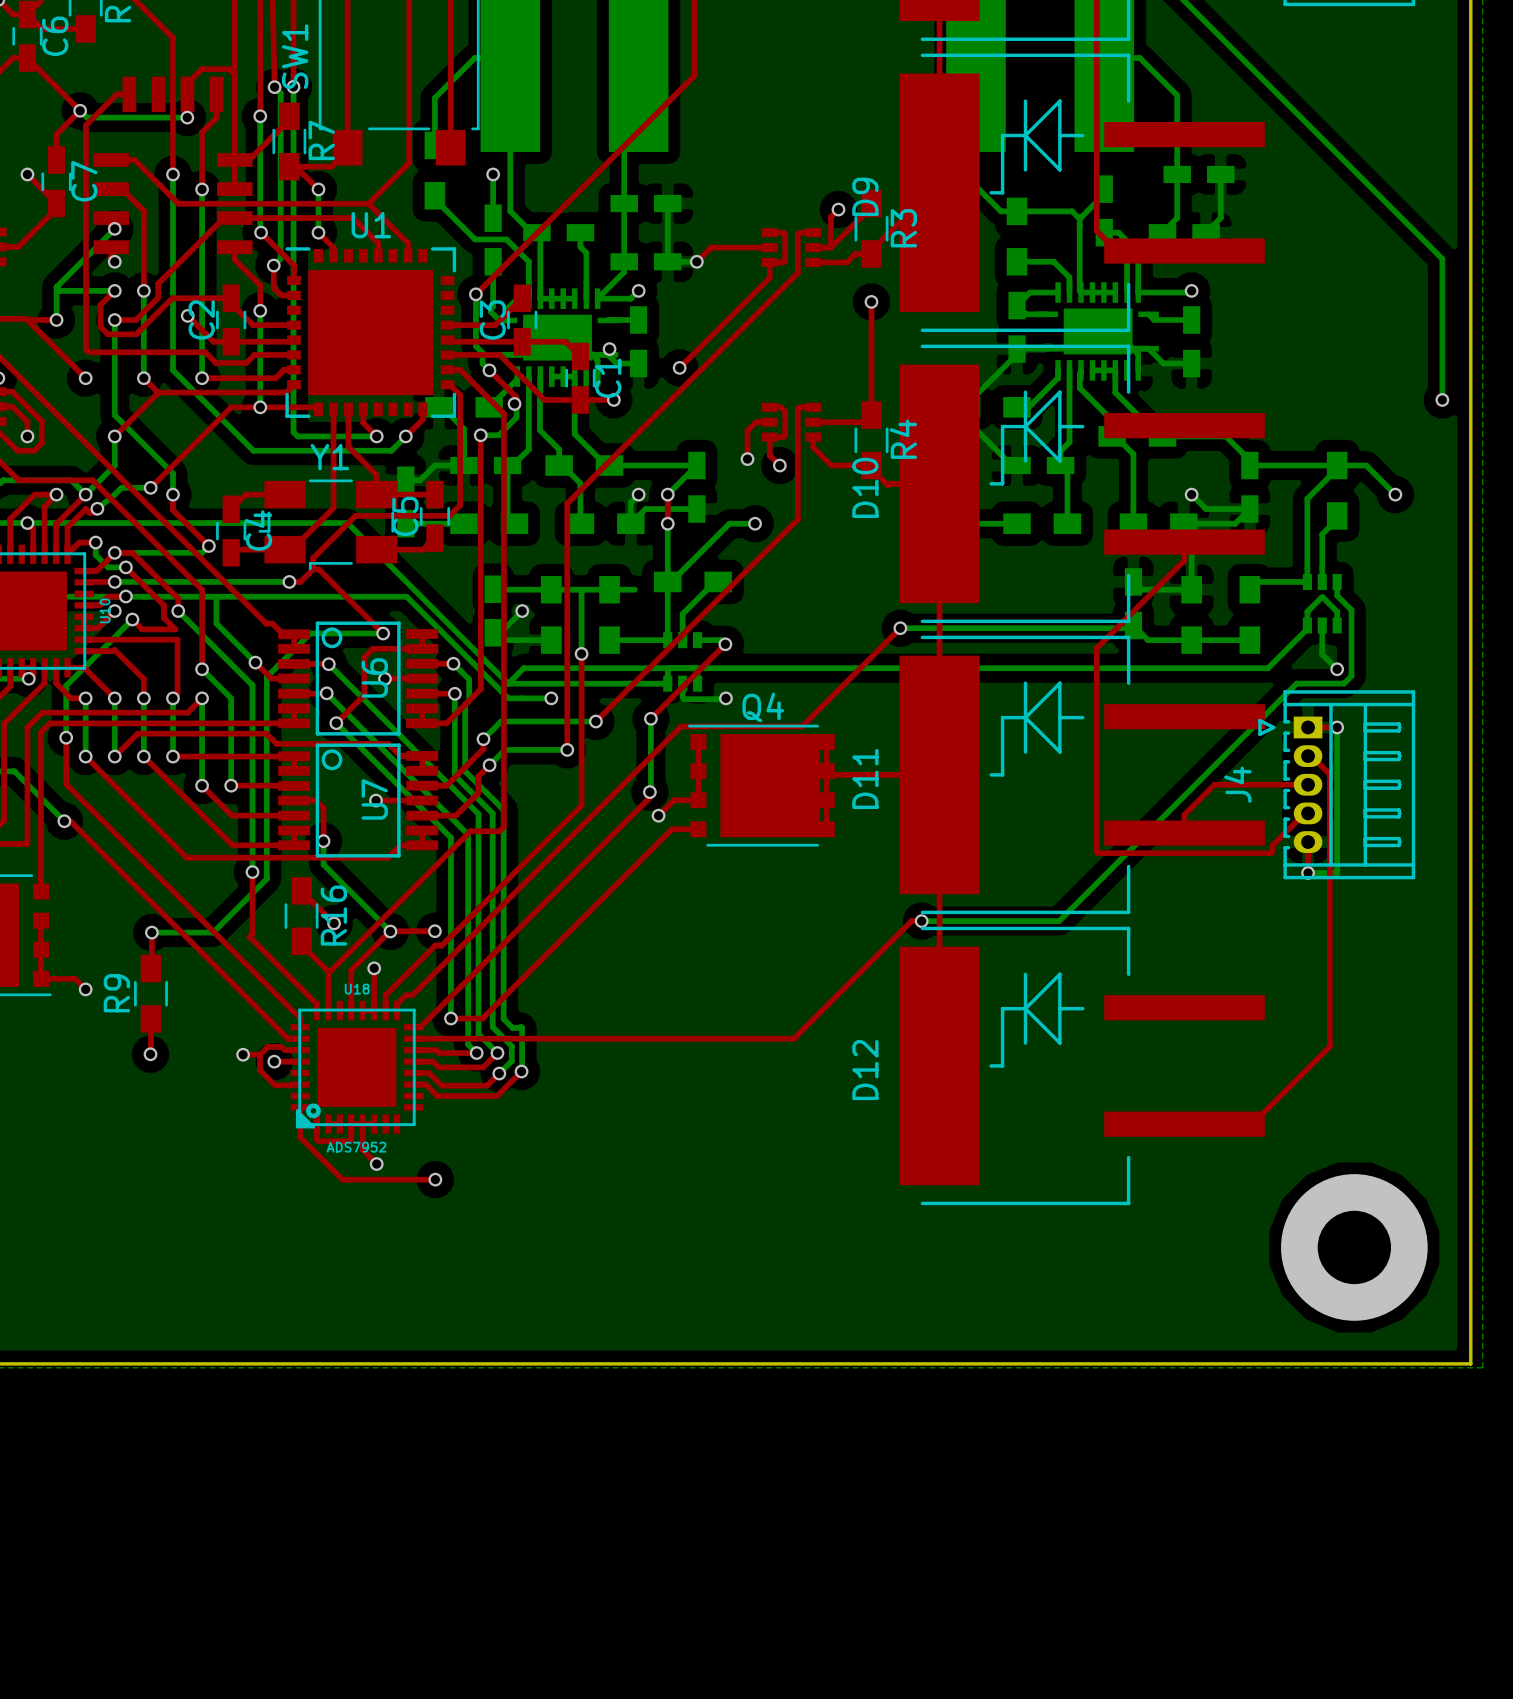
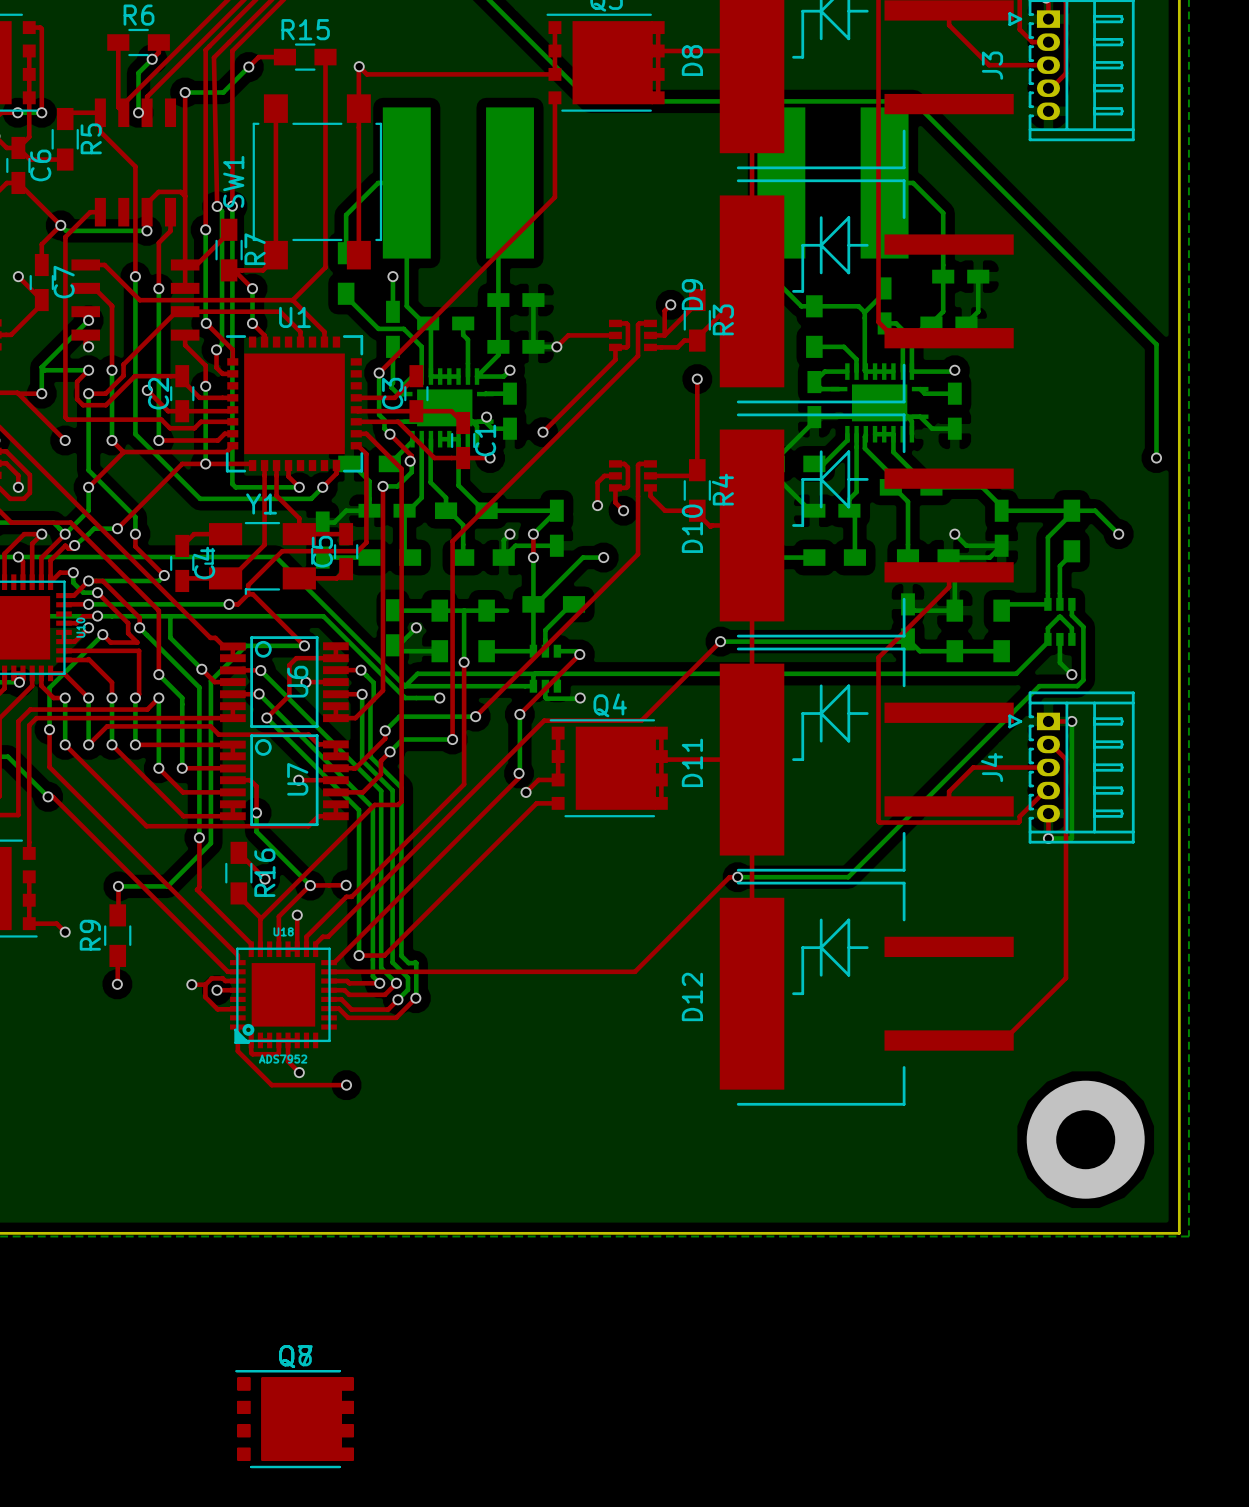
part: none -> (294, 1419)
part: none -> (294, 1419)

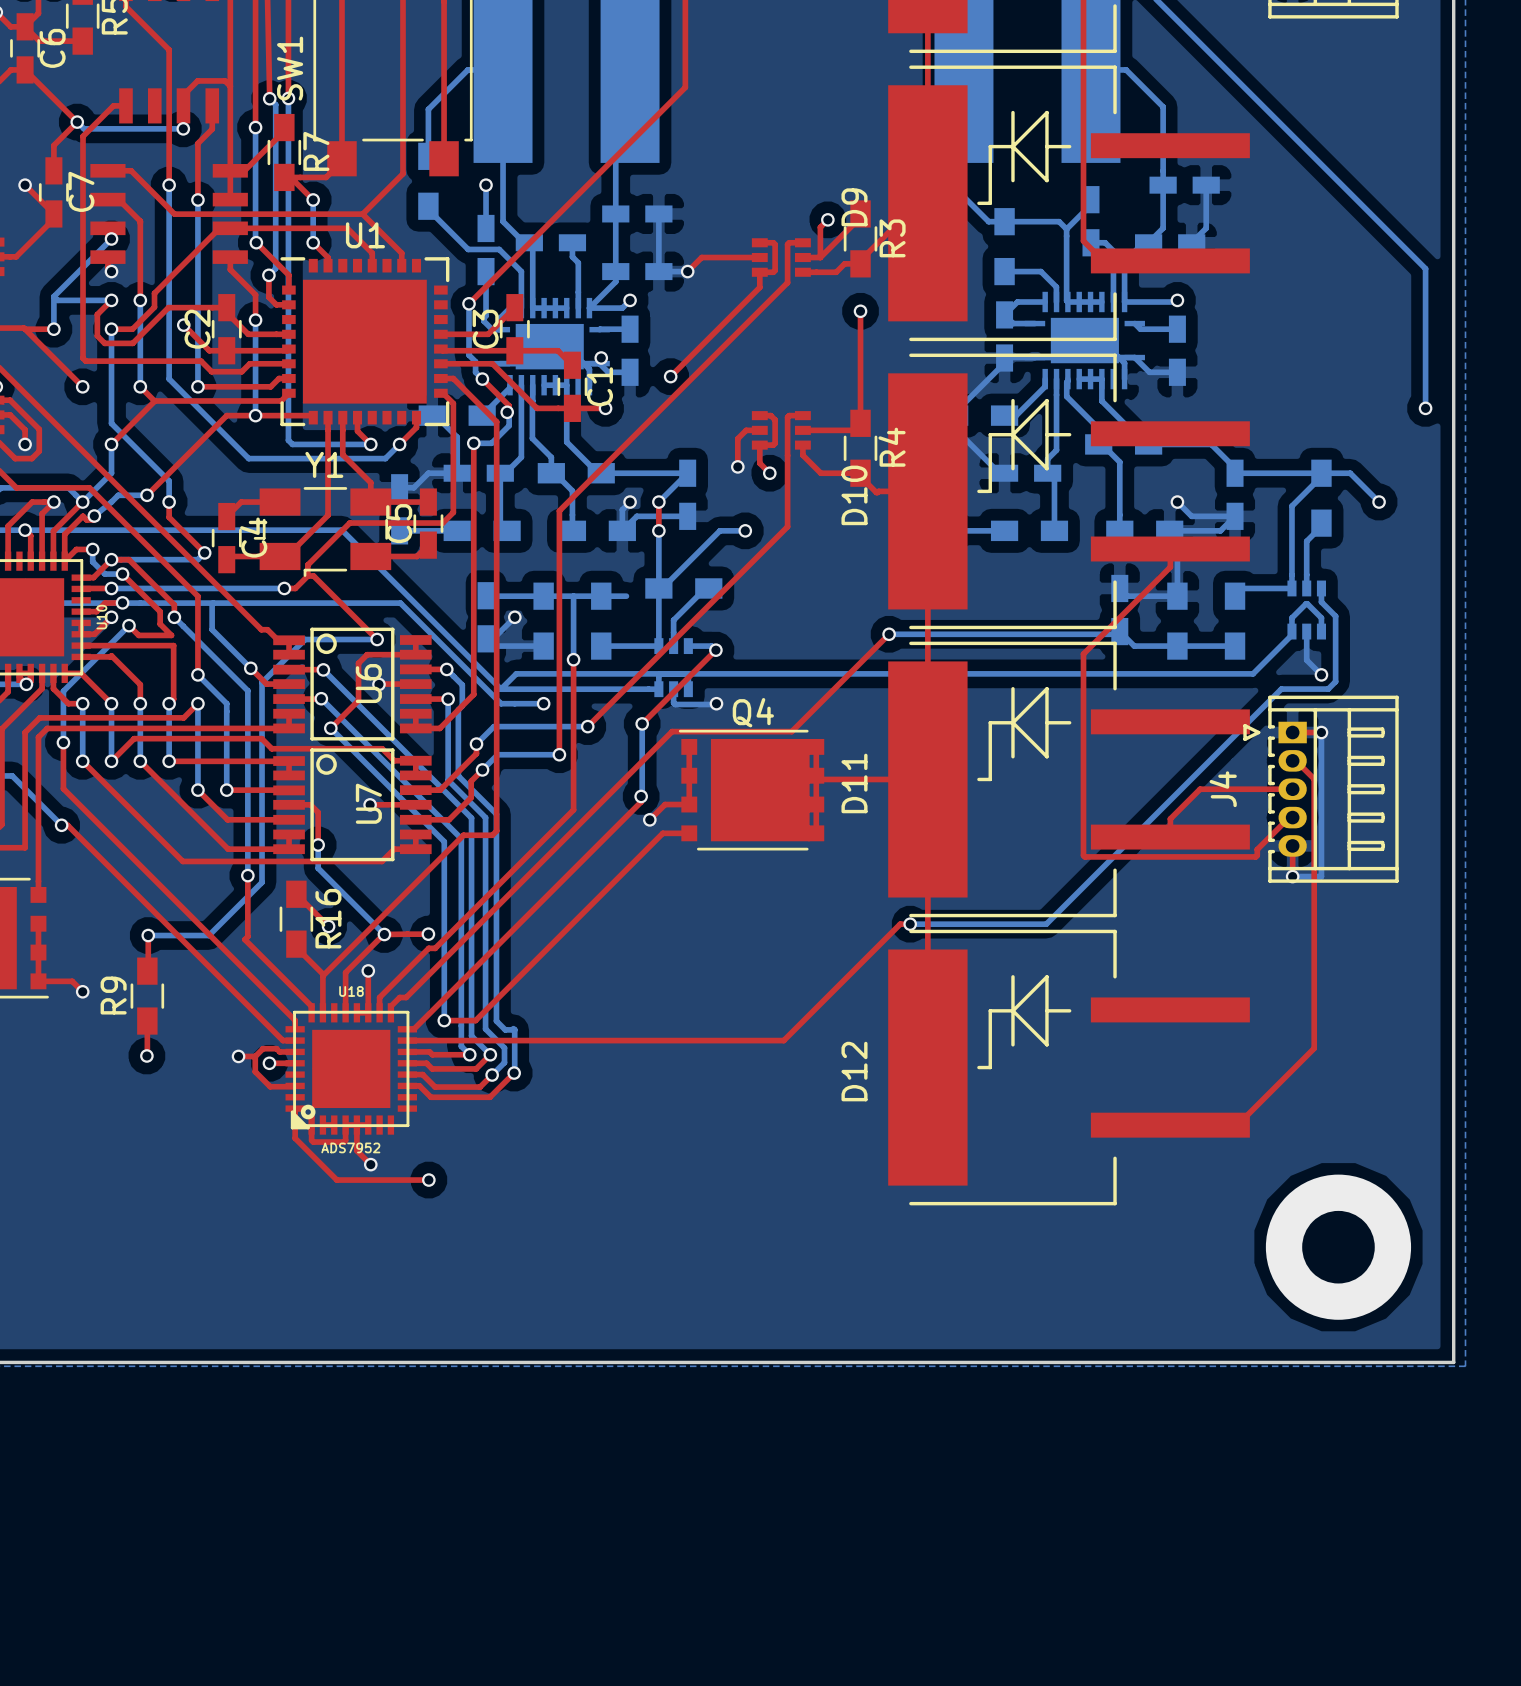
part: (294, 1419) -> none
part: (294, 1419) -> none

